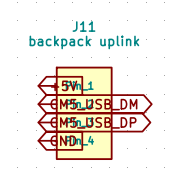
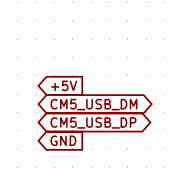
J11: backpack uplink (75, 113) -> none

